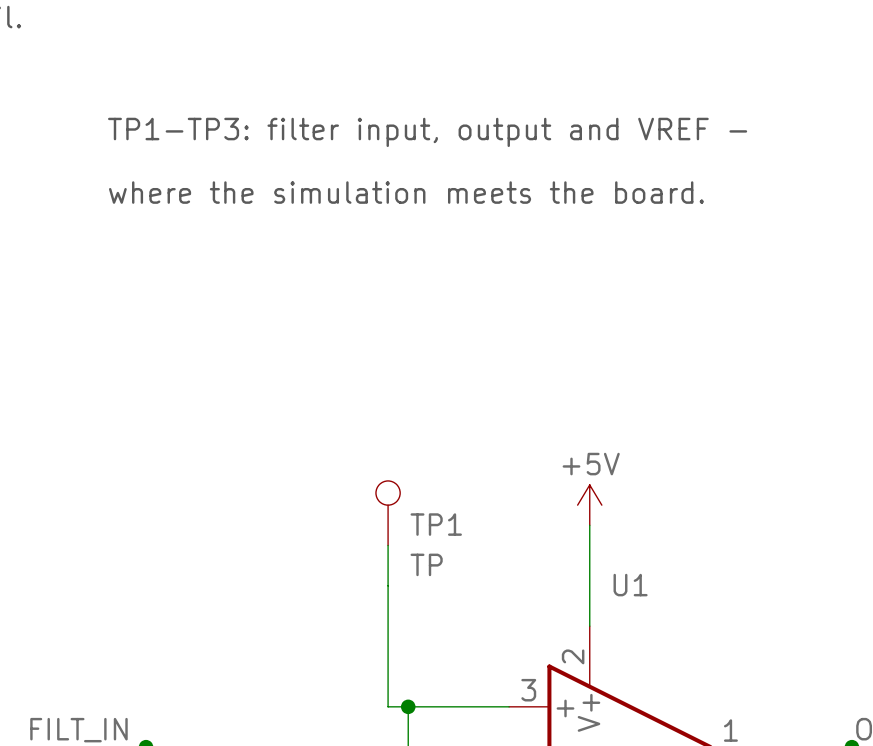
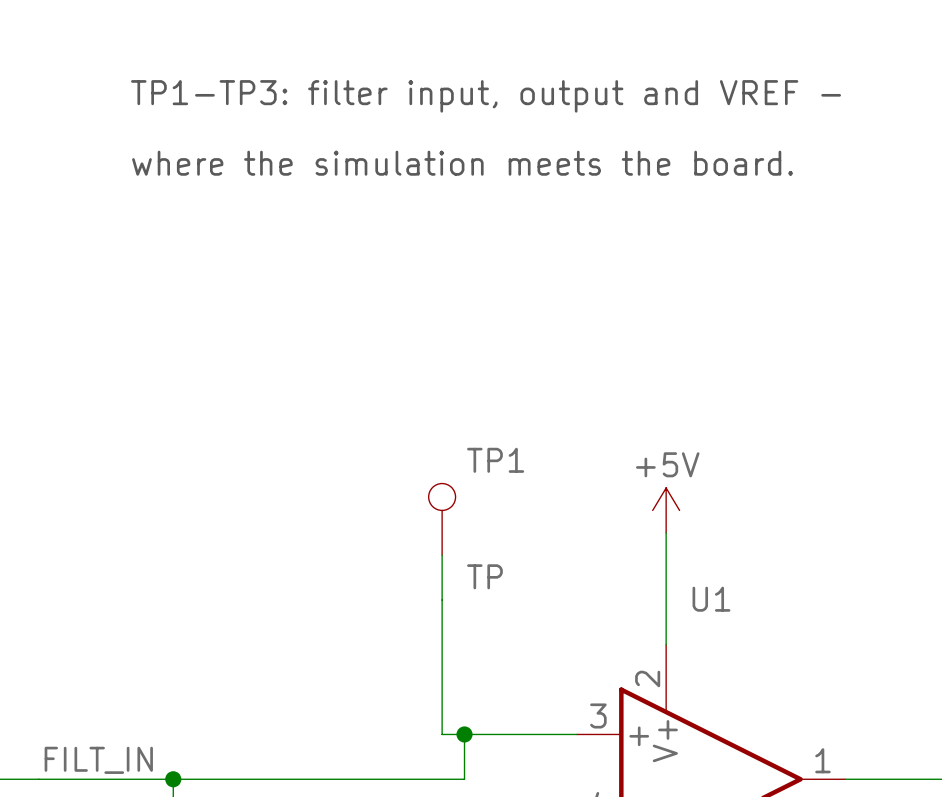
TP1 name position: TP1 (436, 524) -> TP1 (495, 460)

